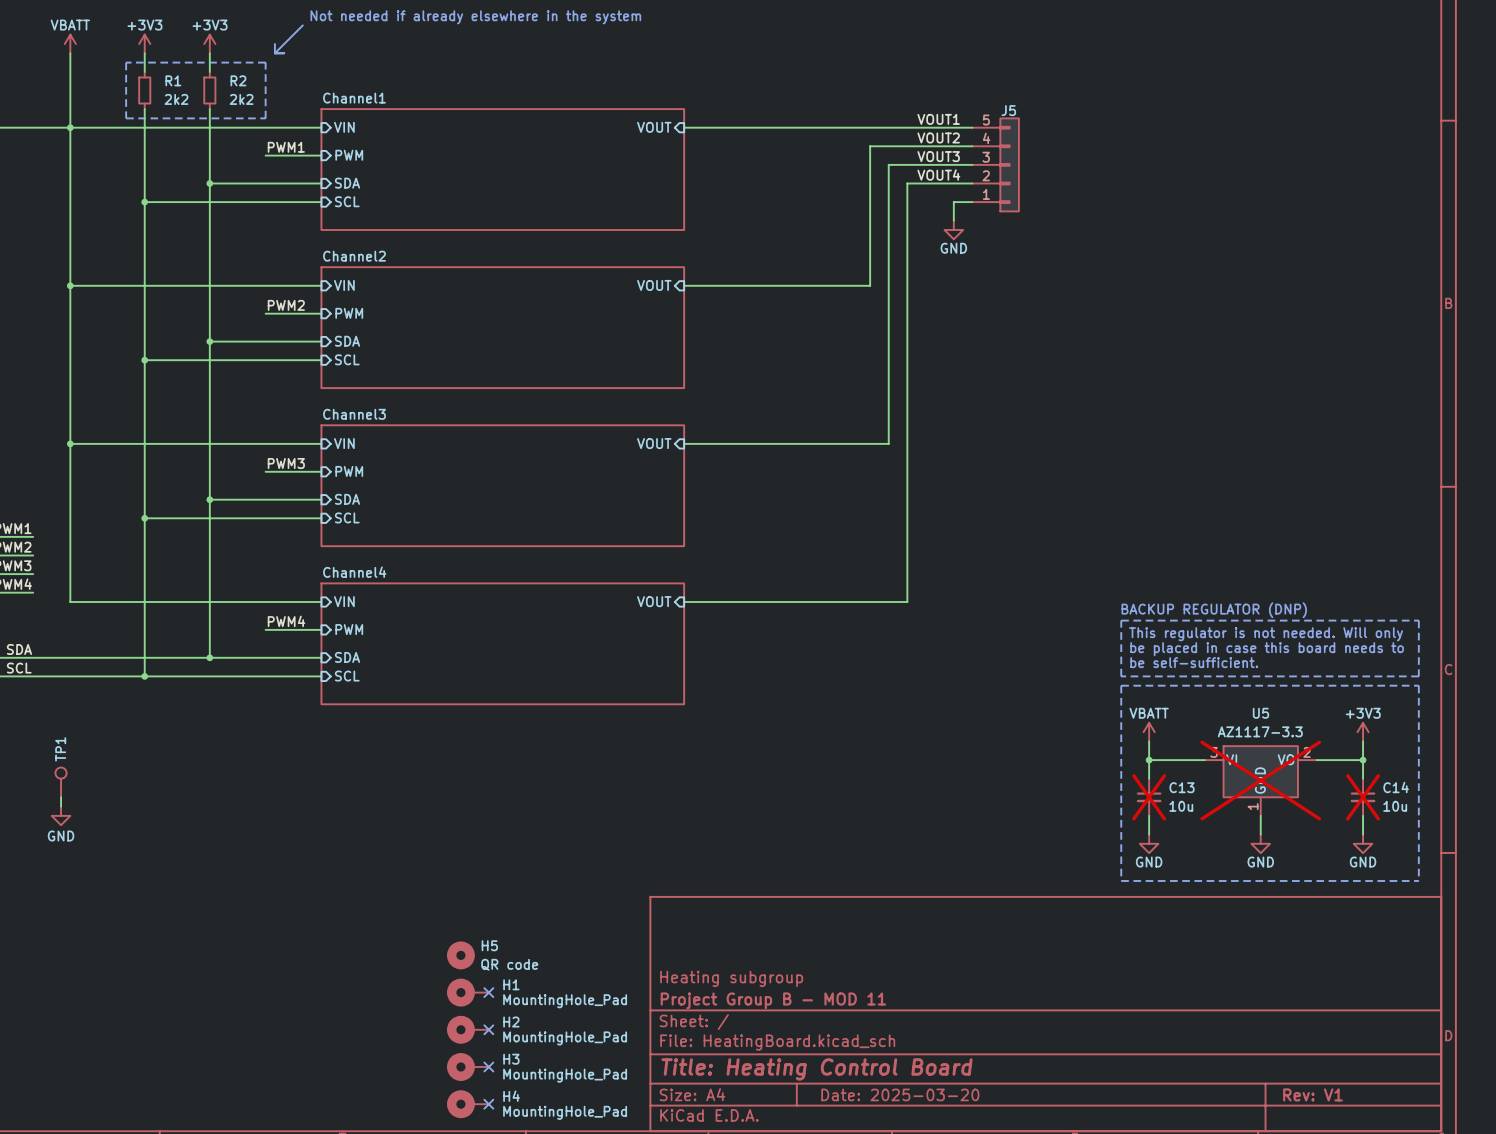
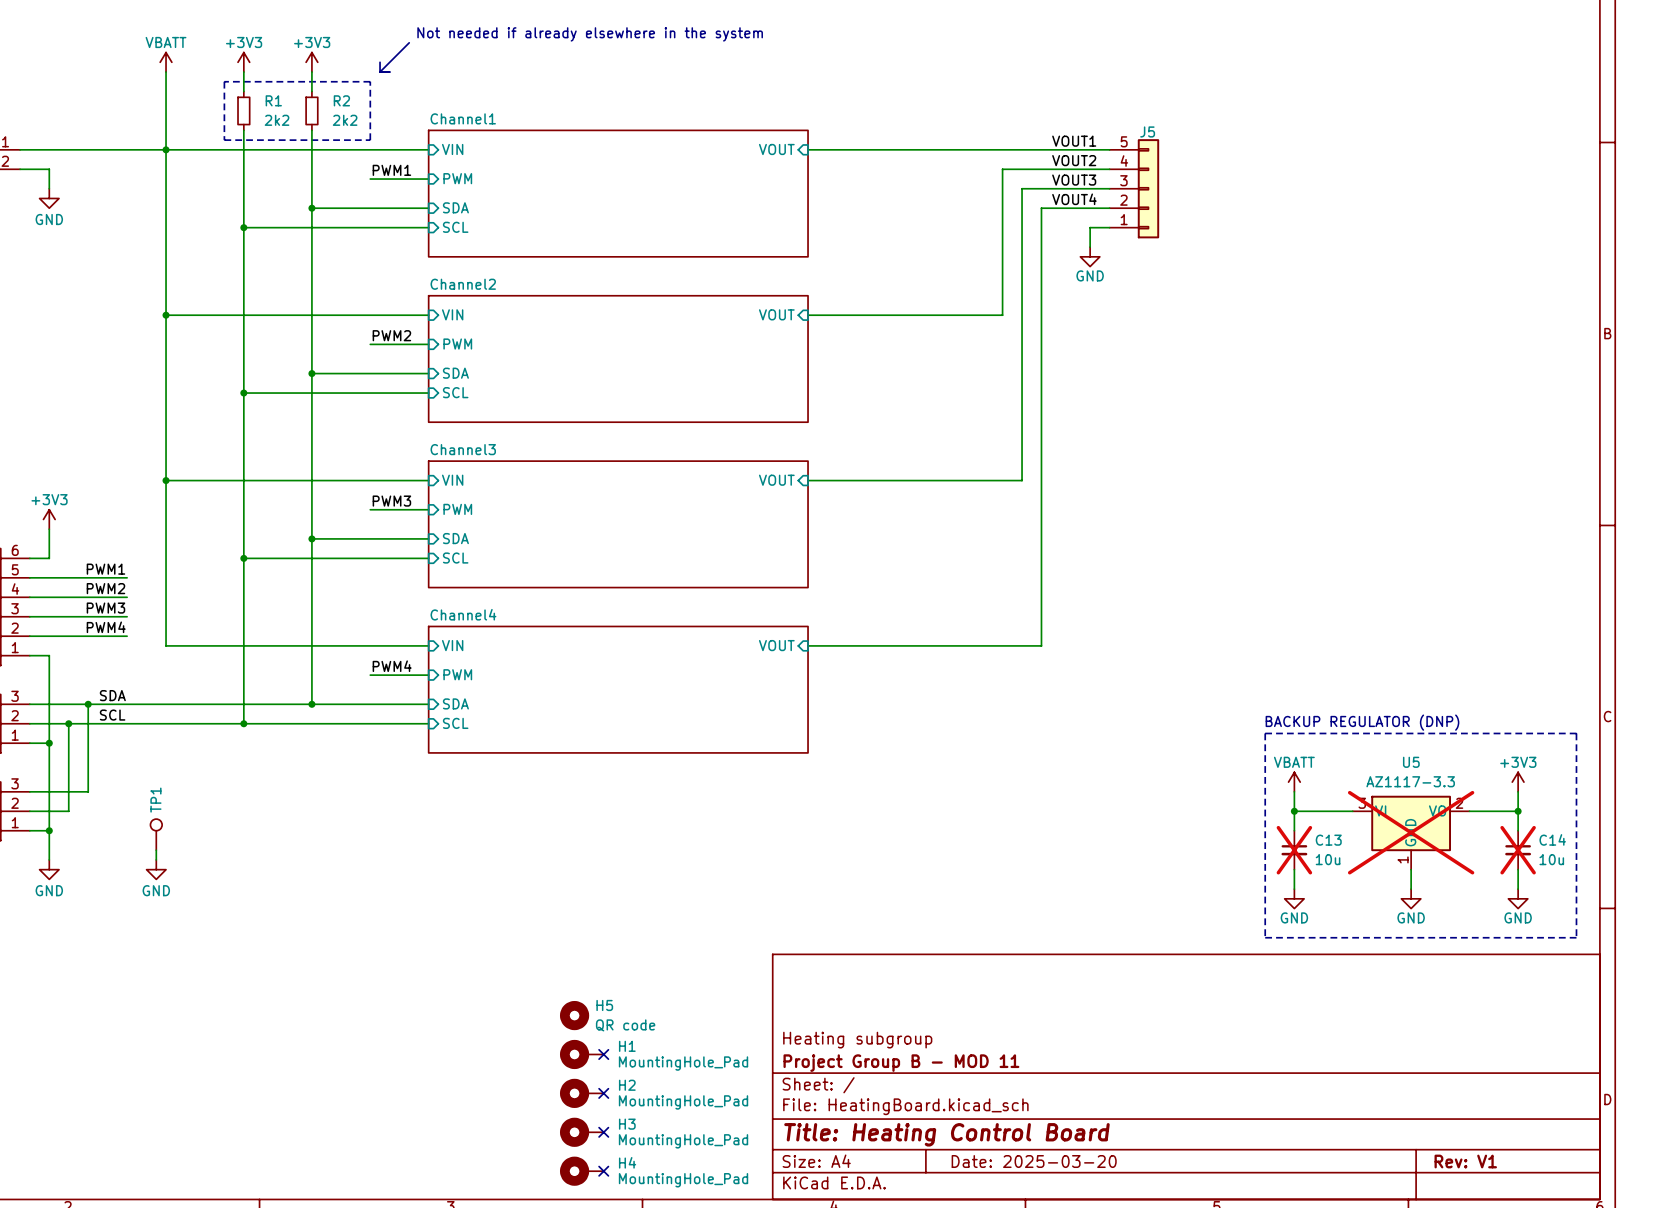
text position: BACKUP REGULATOR (DNP) (1214, 610) -> BACKUP REGULATOR (DNP) (1362, 722)
line: (1121, 620) (1418, 620) (1418, 676) (1121, 676) (1121, 620) -> none
text: This regulator is not needed. Will only (1266, 634) -> none
text: be placed in case this board needs to (1267, 649) -> none
text: be self-sufficient. (1194, 662) -> none

